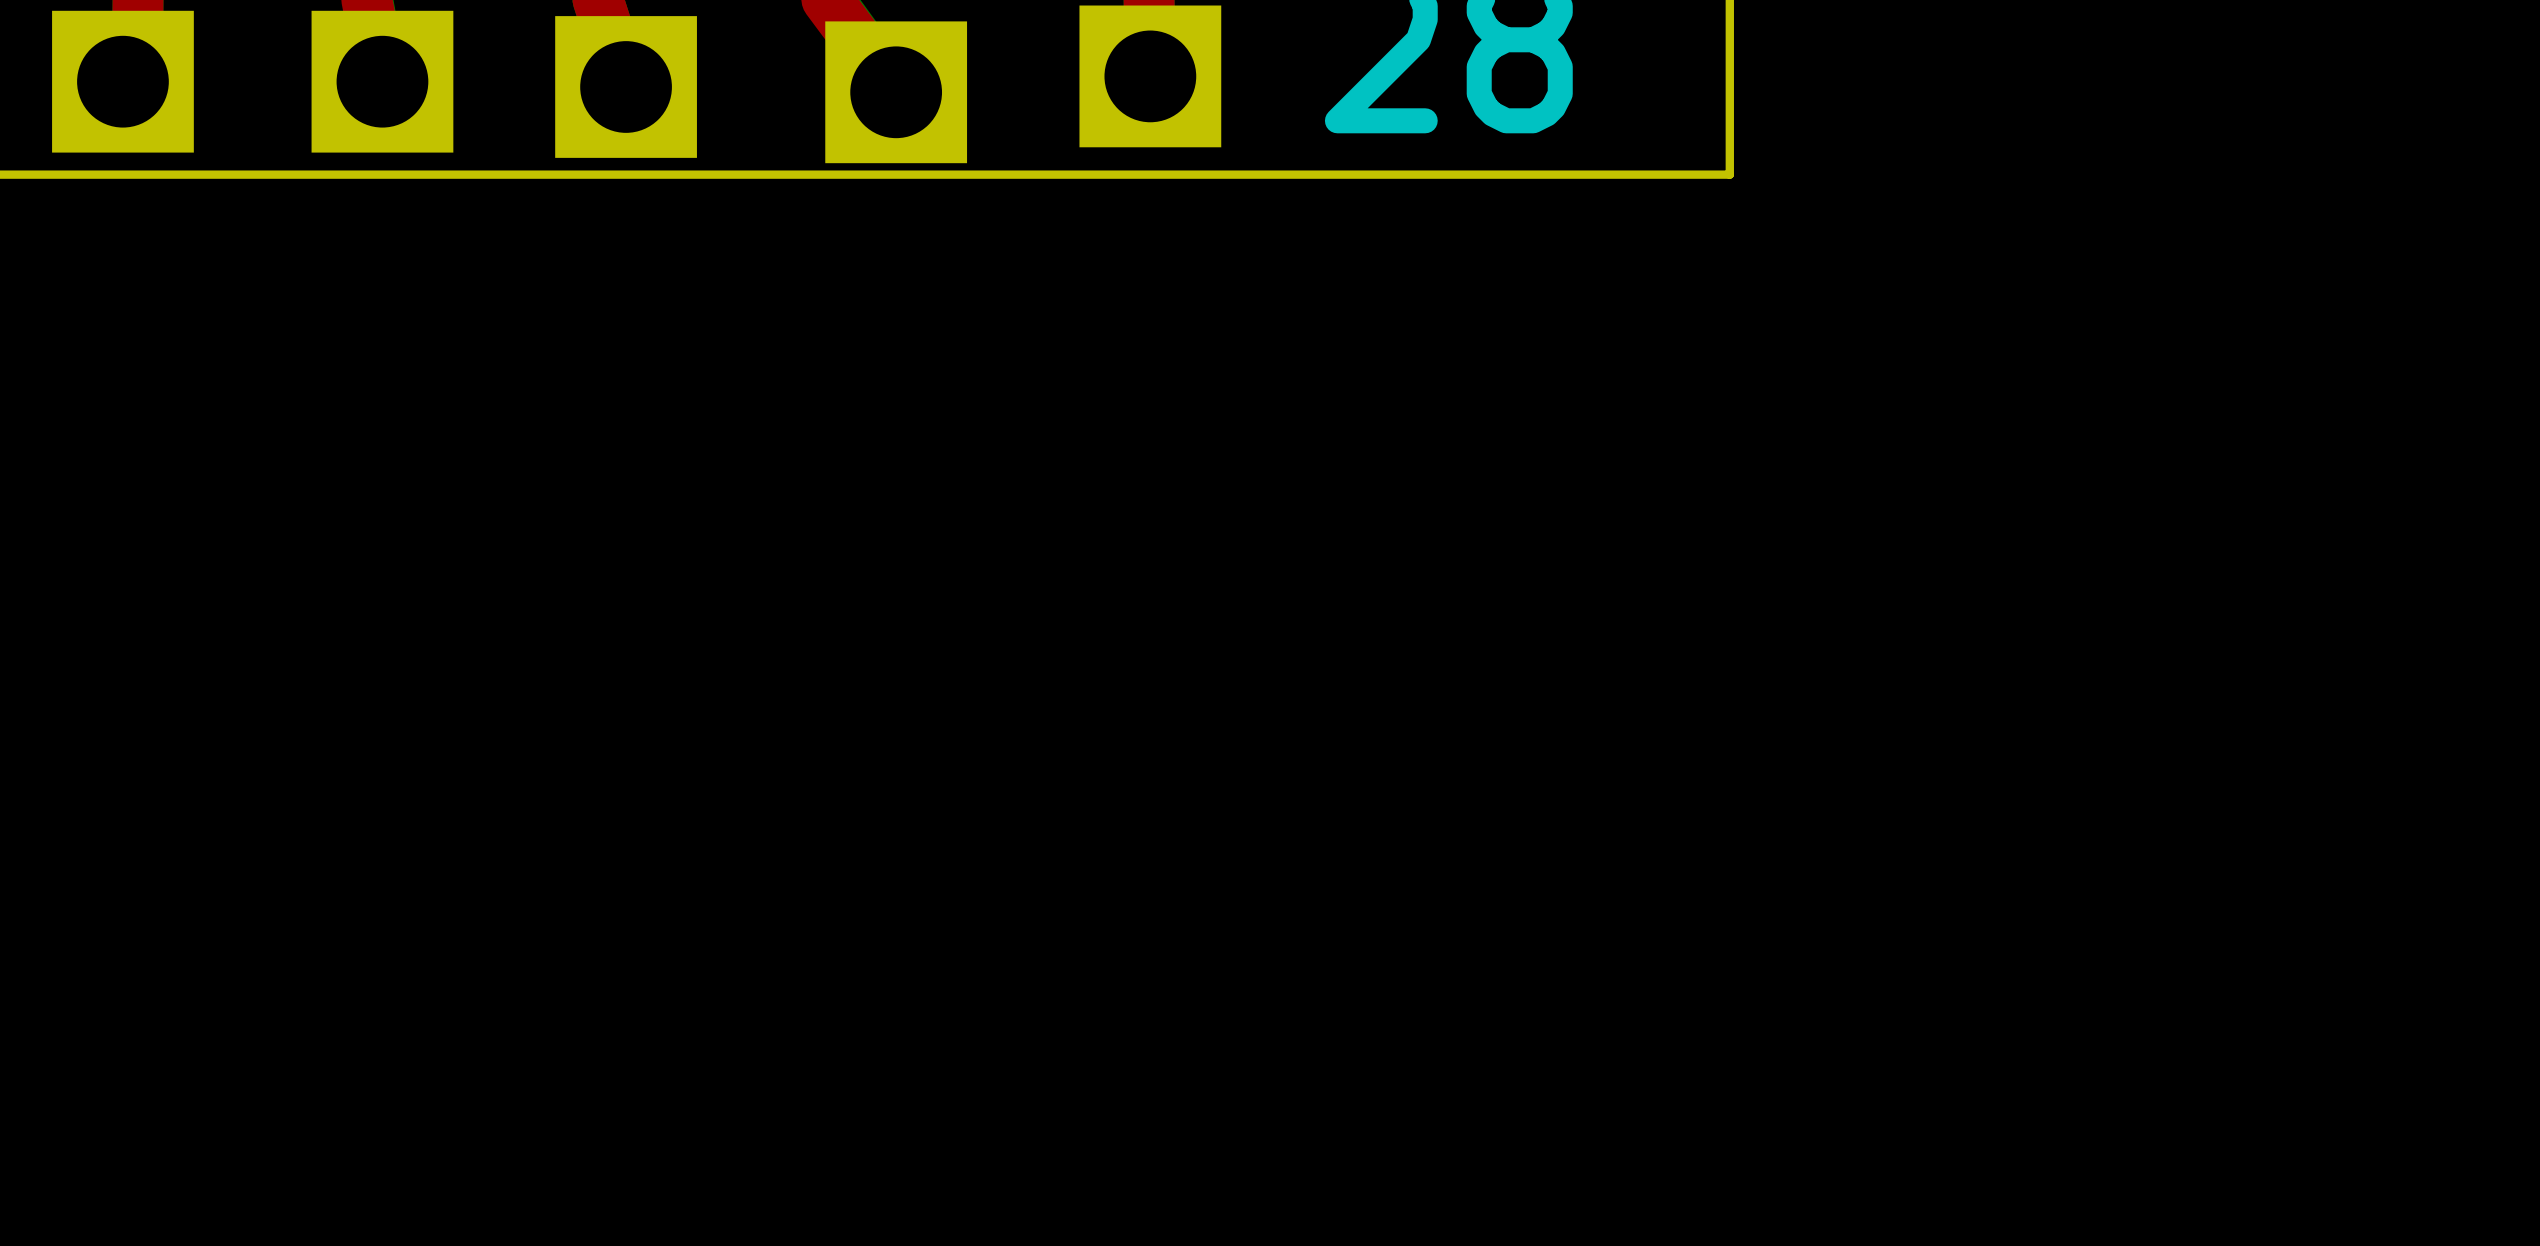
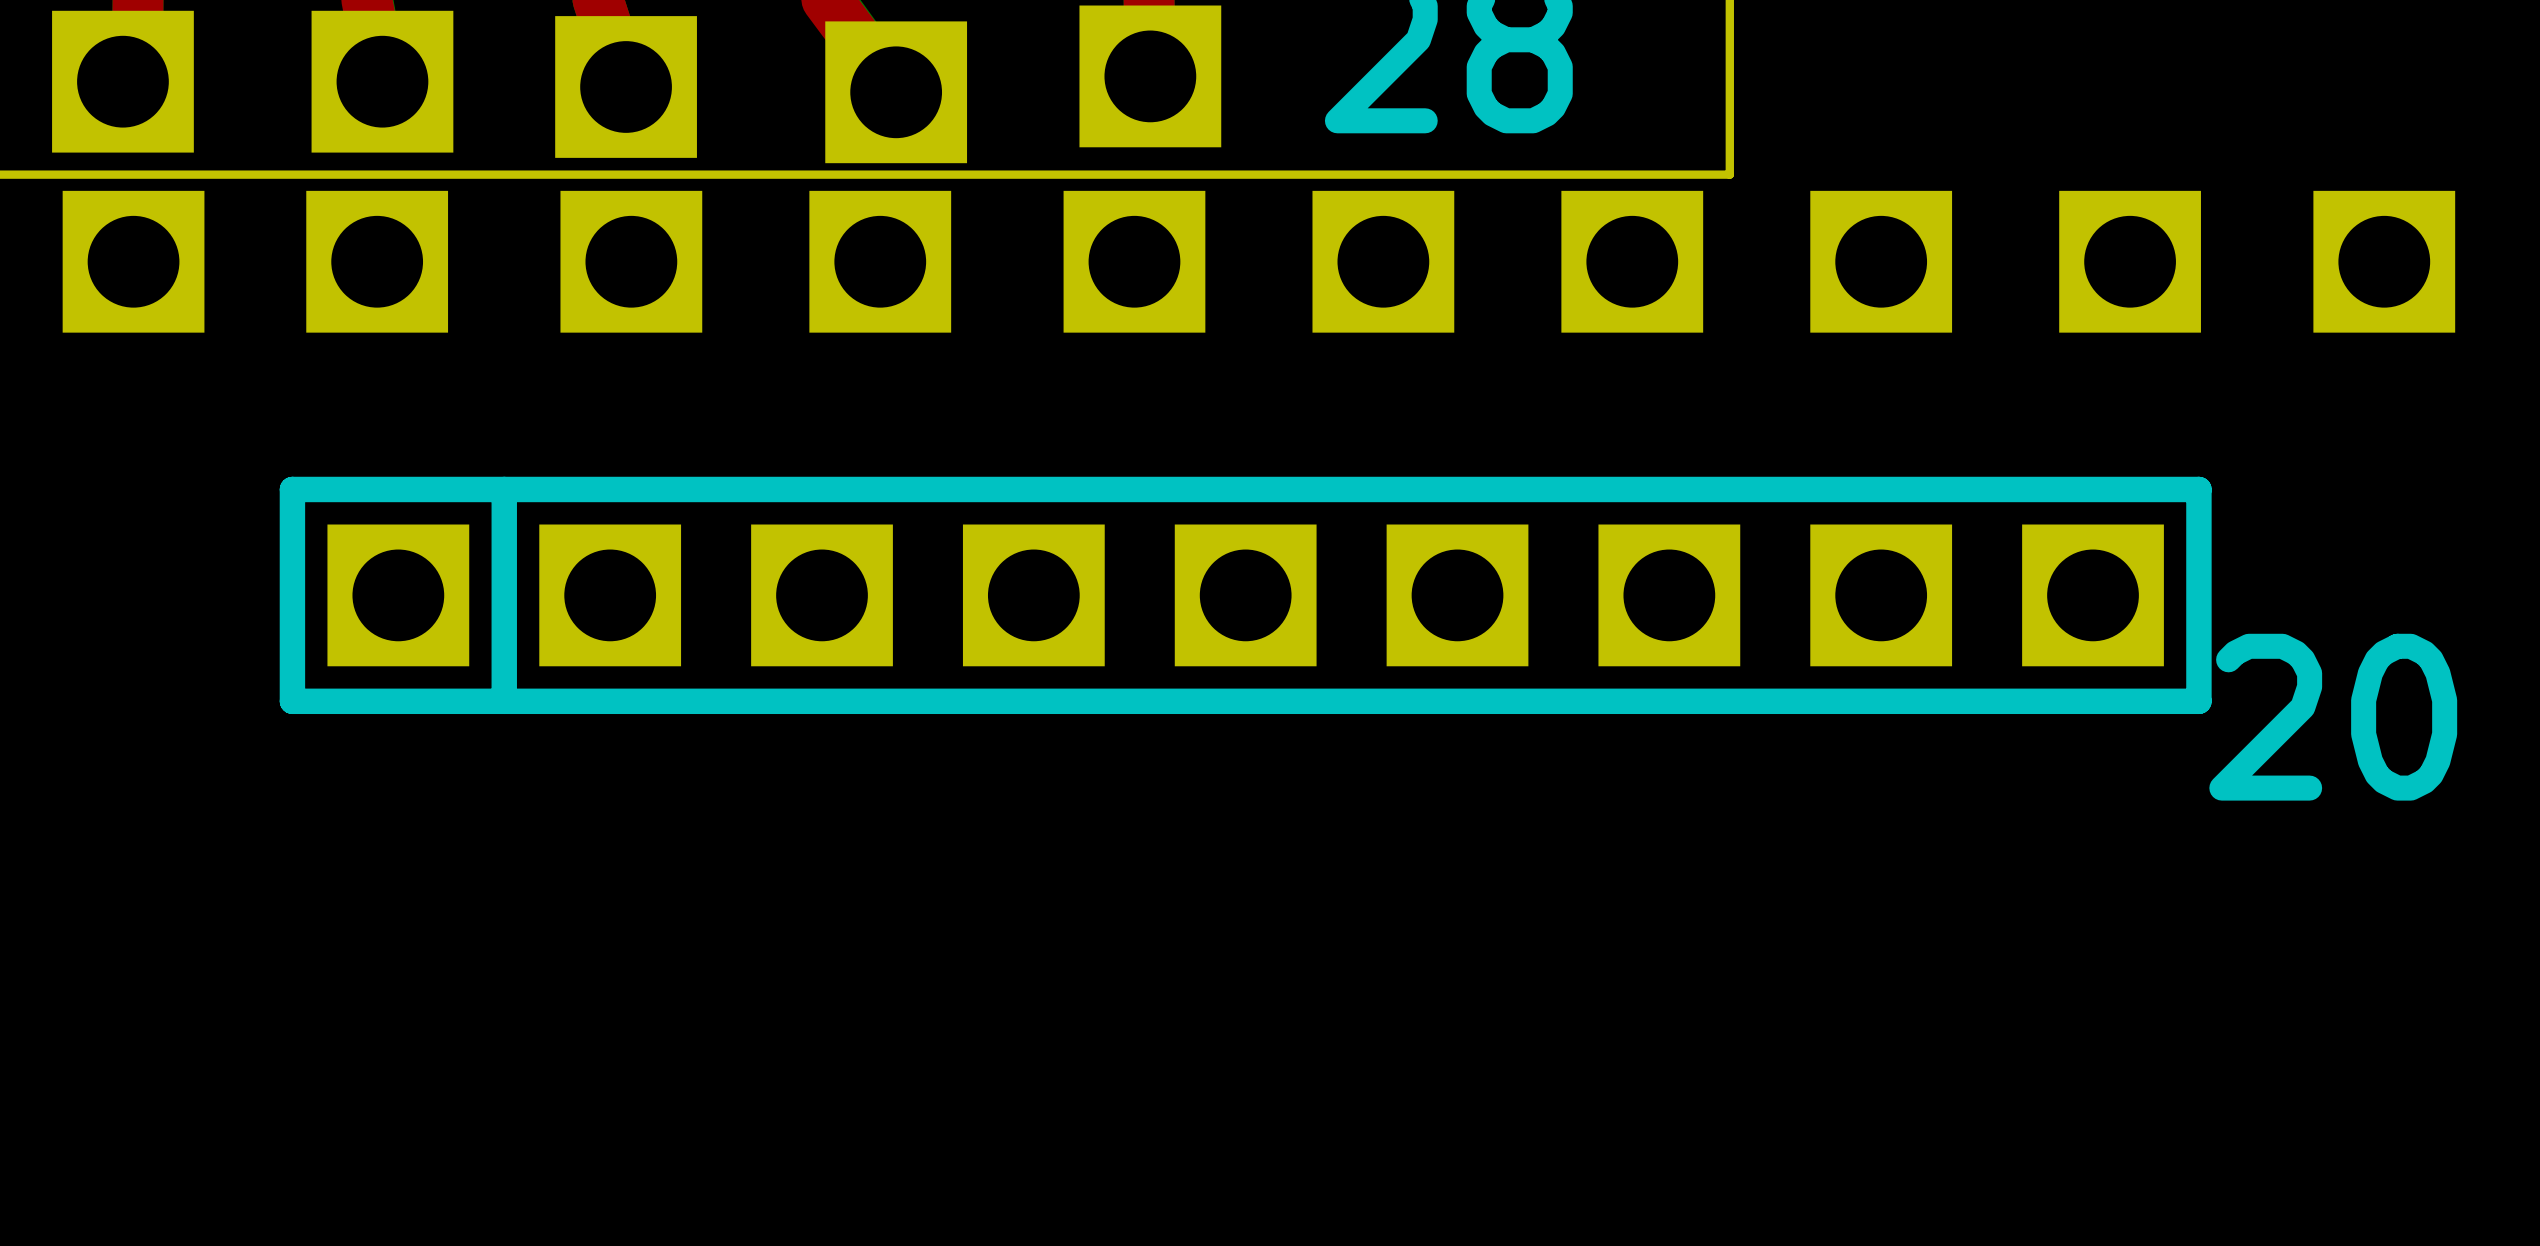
part: none -> (1258, 261)
part: none -> (1245, 595)
text: none -> 20 (2333, 717)

